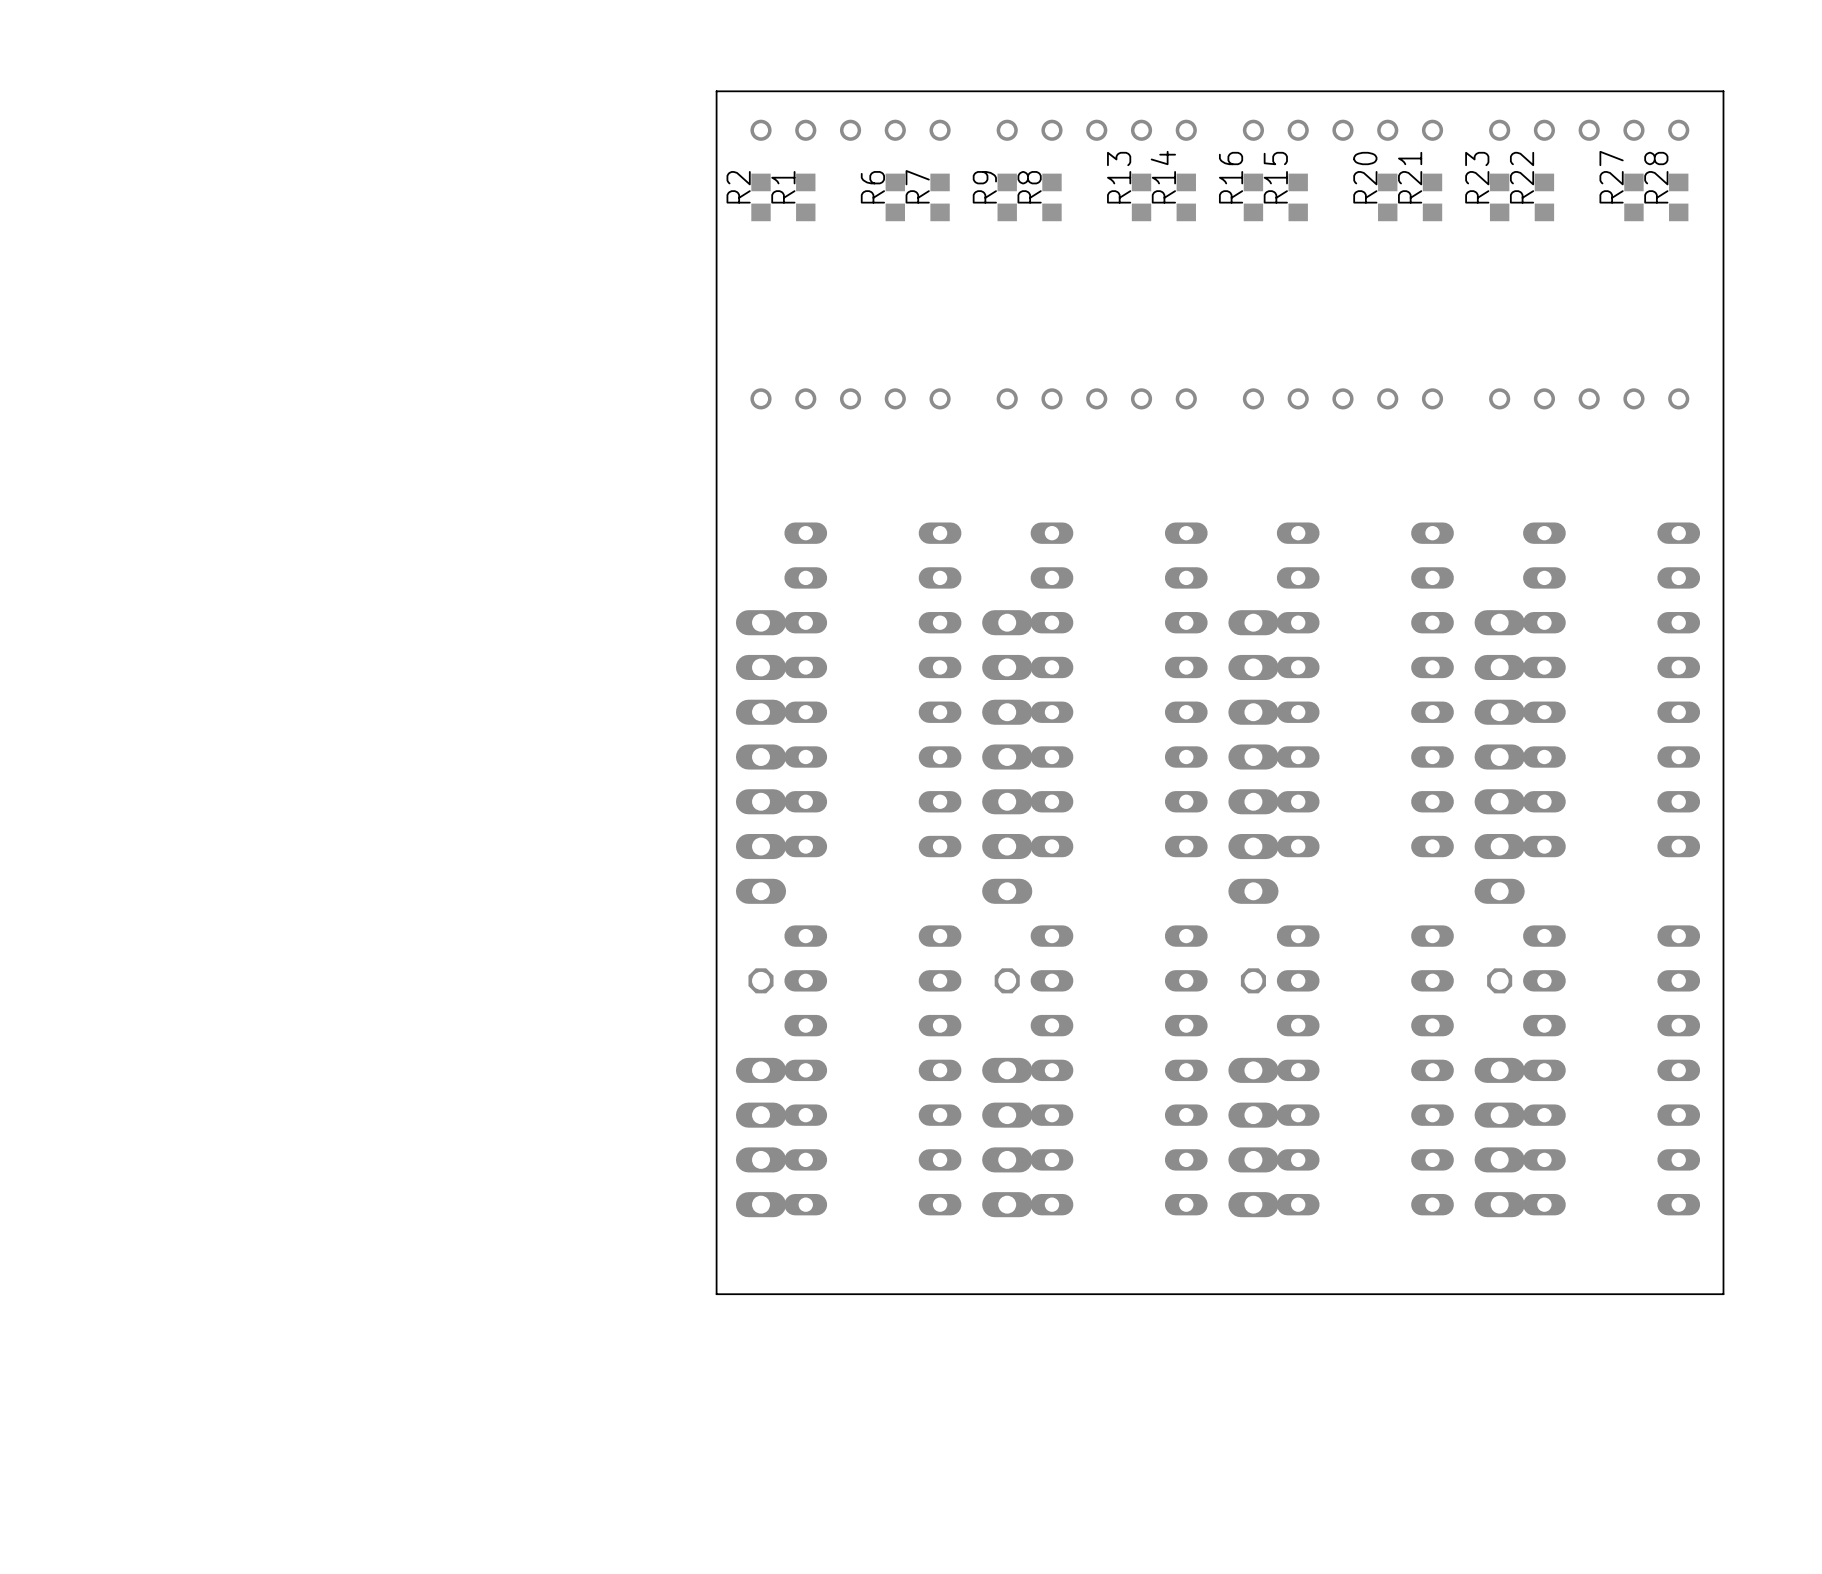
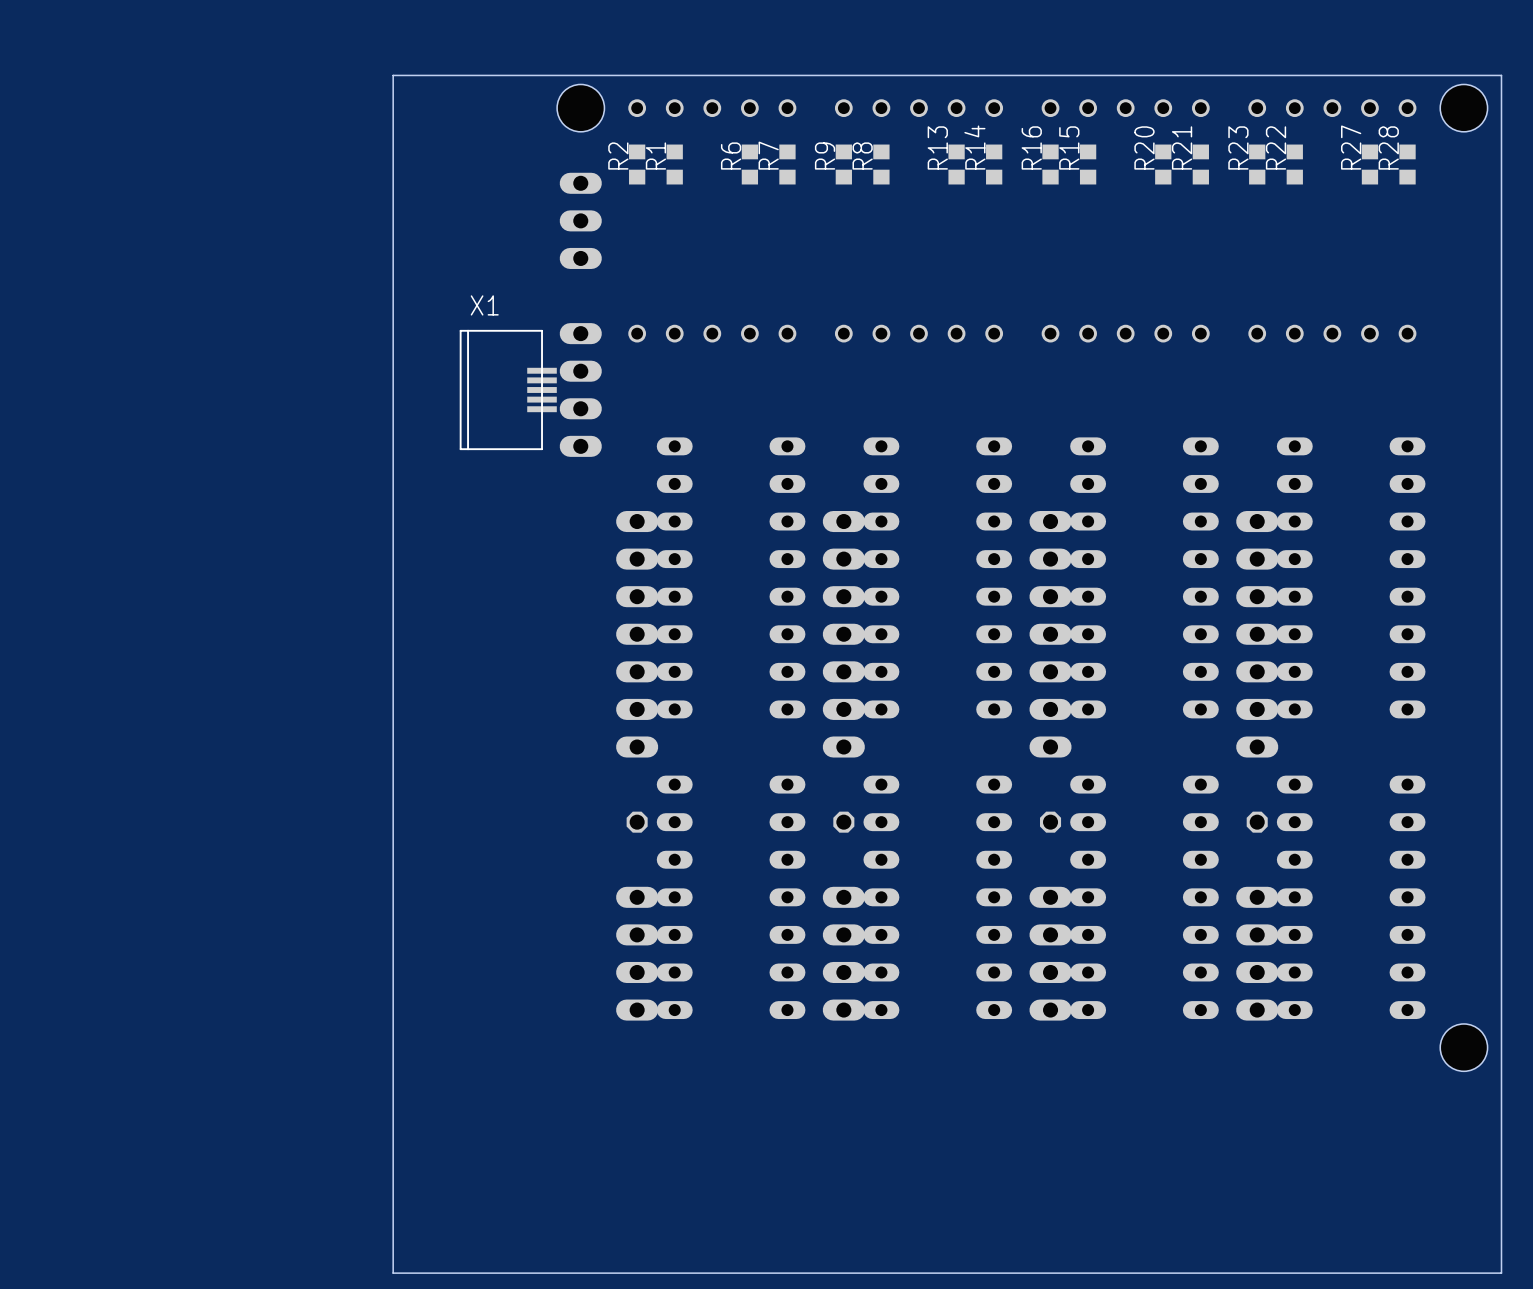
board edge: (1723, 91) (1723, 1294) (716, 1294) (716, 91) -> (1445, 75) (1501, 75) (1501, 1273) (393, 1273) (393, 75) (599, 75)
hole: none -> (580, 108)
hole: none -> (1463, 108)
part: none -> (580, 220)
X1: none -> (508, 389)
part: none -> (580, 389)
hole: none -> (1463, 1047)

